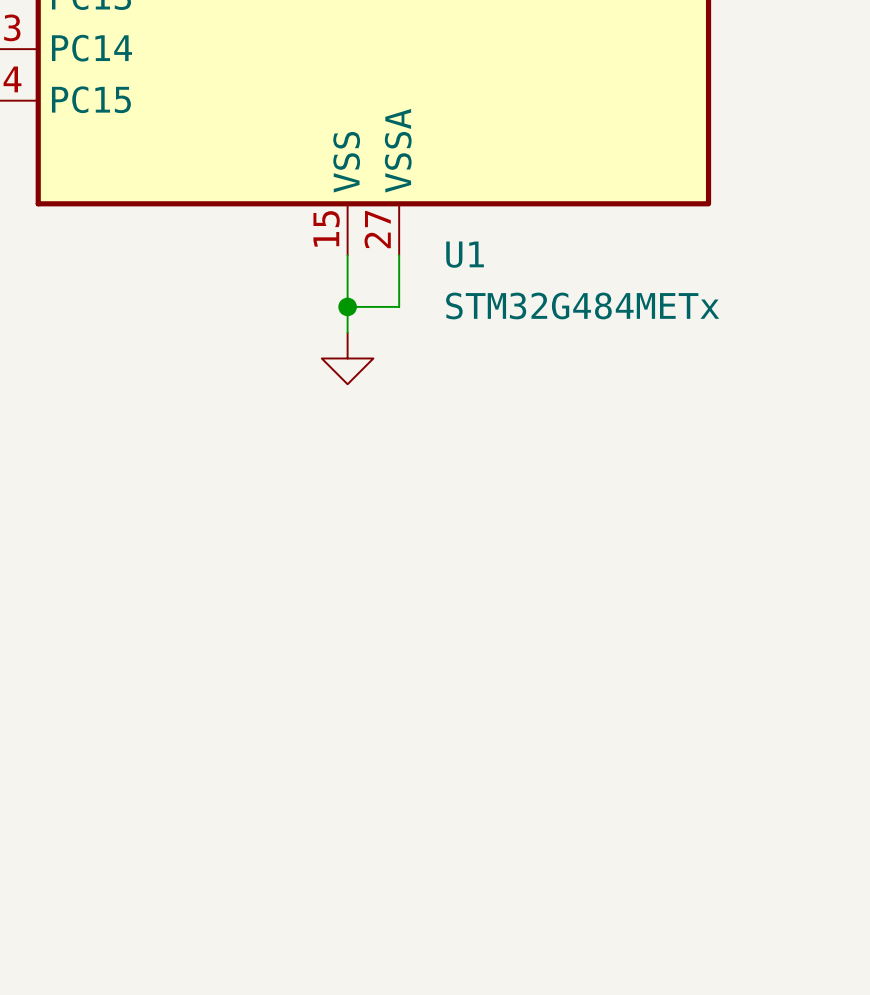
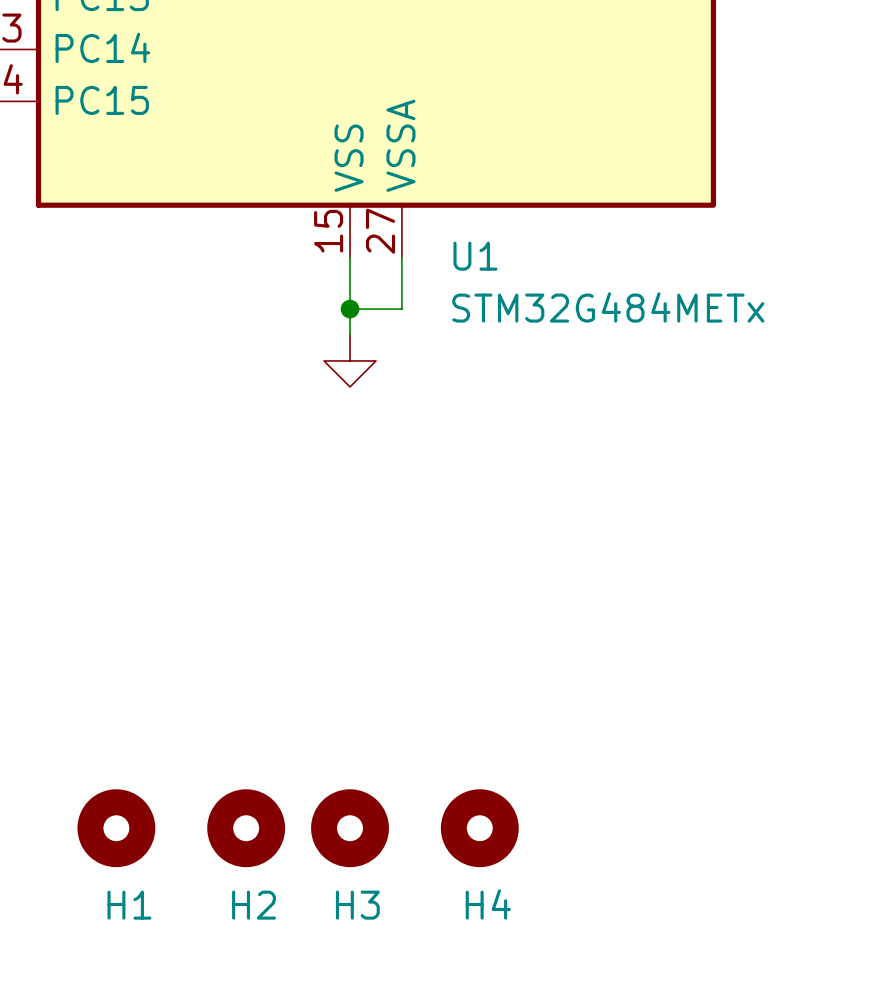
H1: none -> (116, 828)
H2: none -> (246, 828)
H3: none -> (350, 828)
H4: none -> (479, 828)

